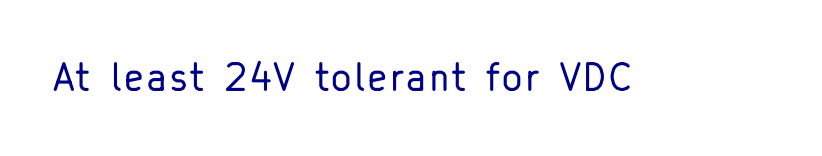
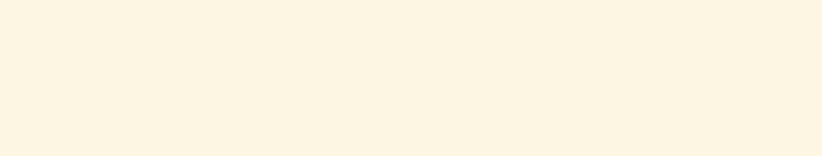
text: At least 24V tolerant for VDC (341, 75) -> none

